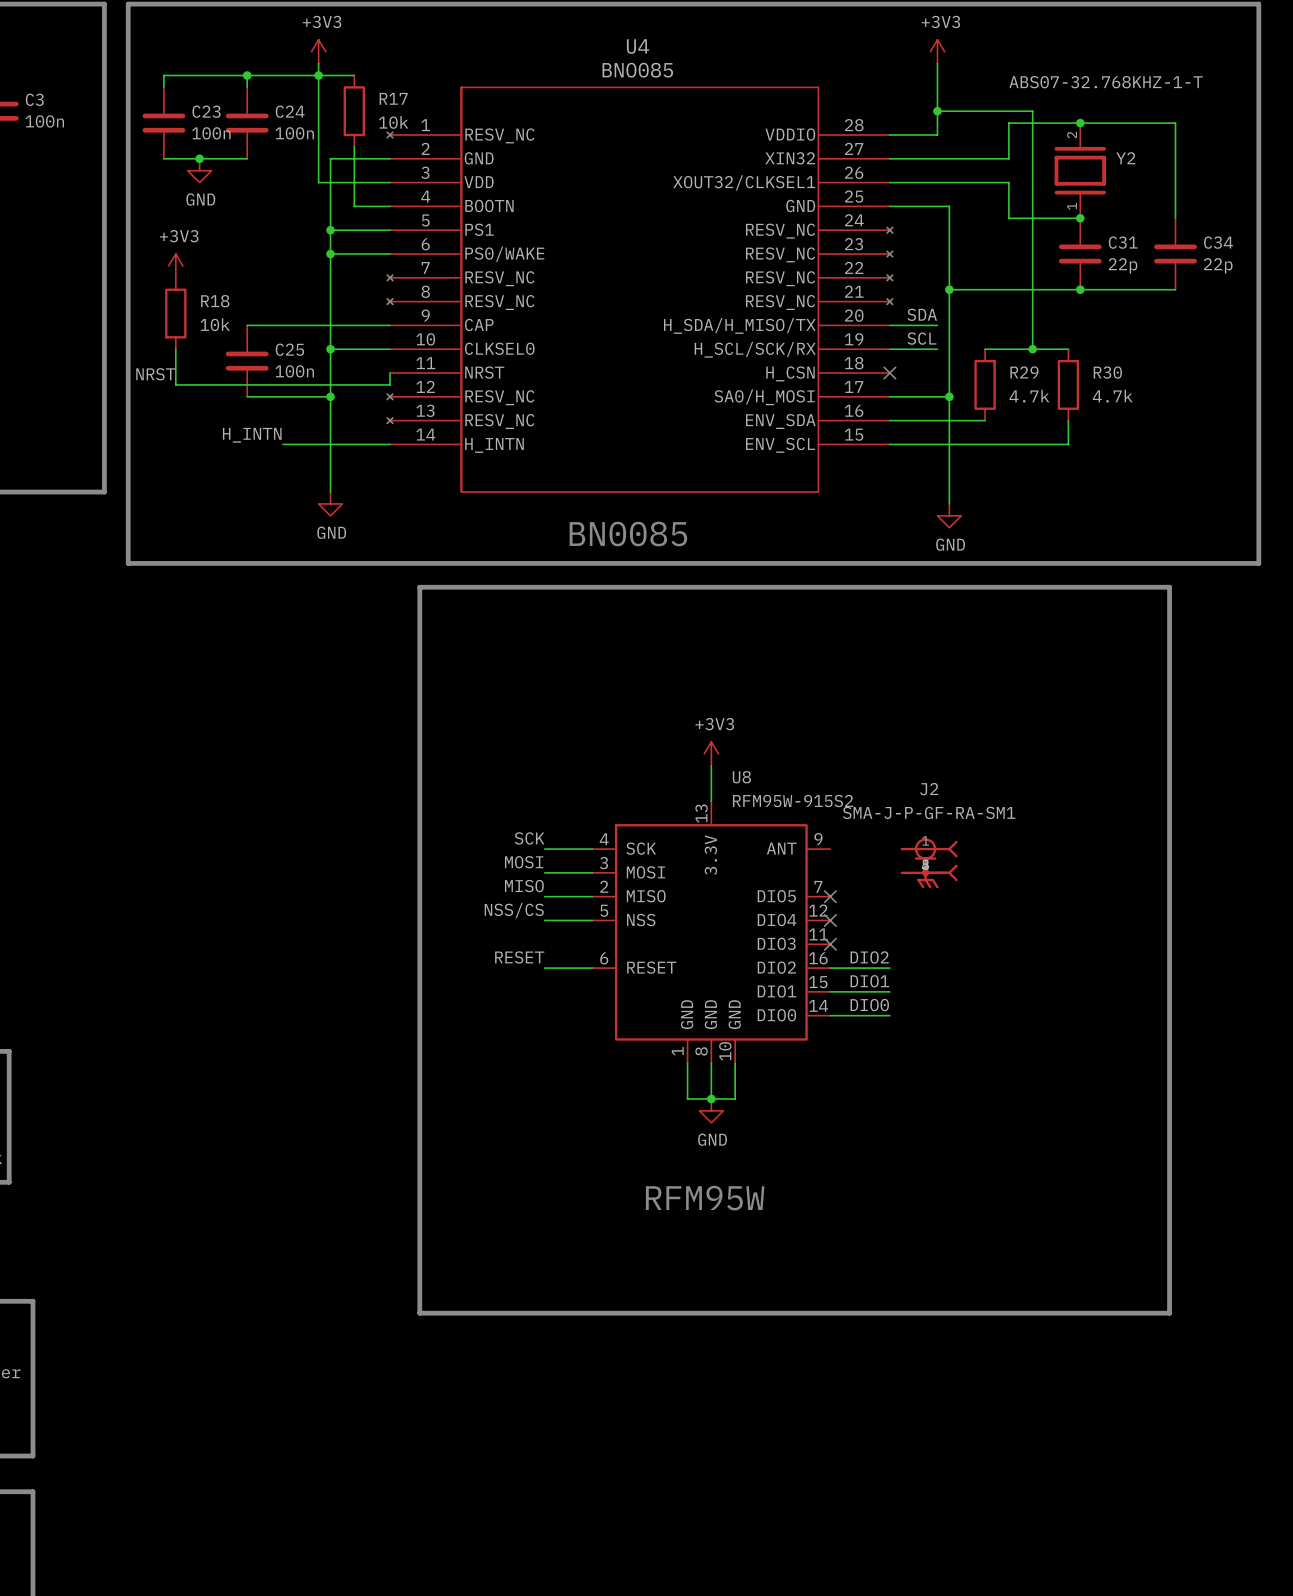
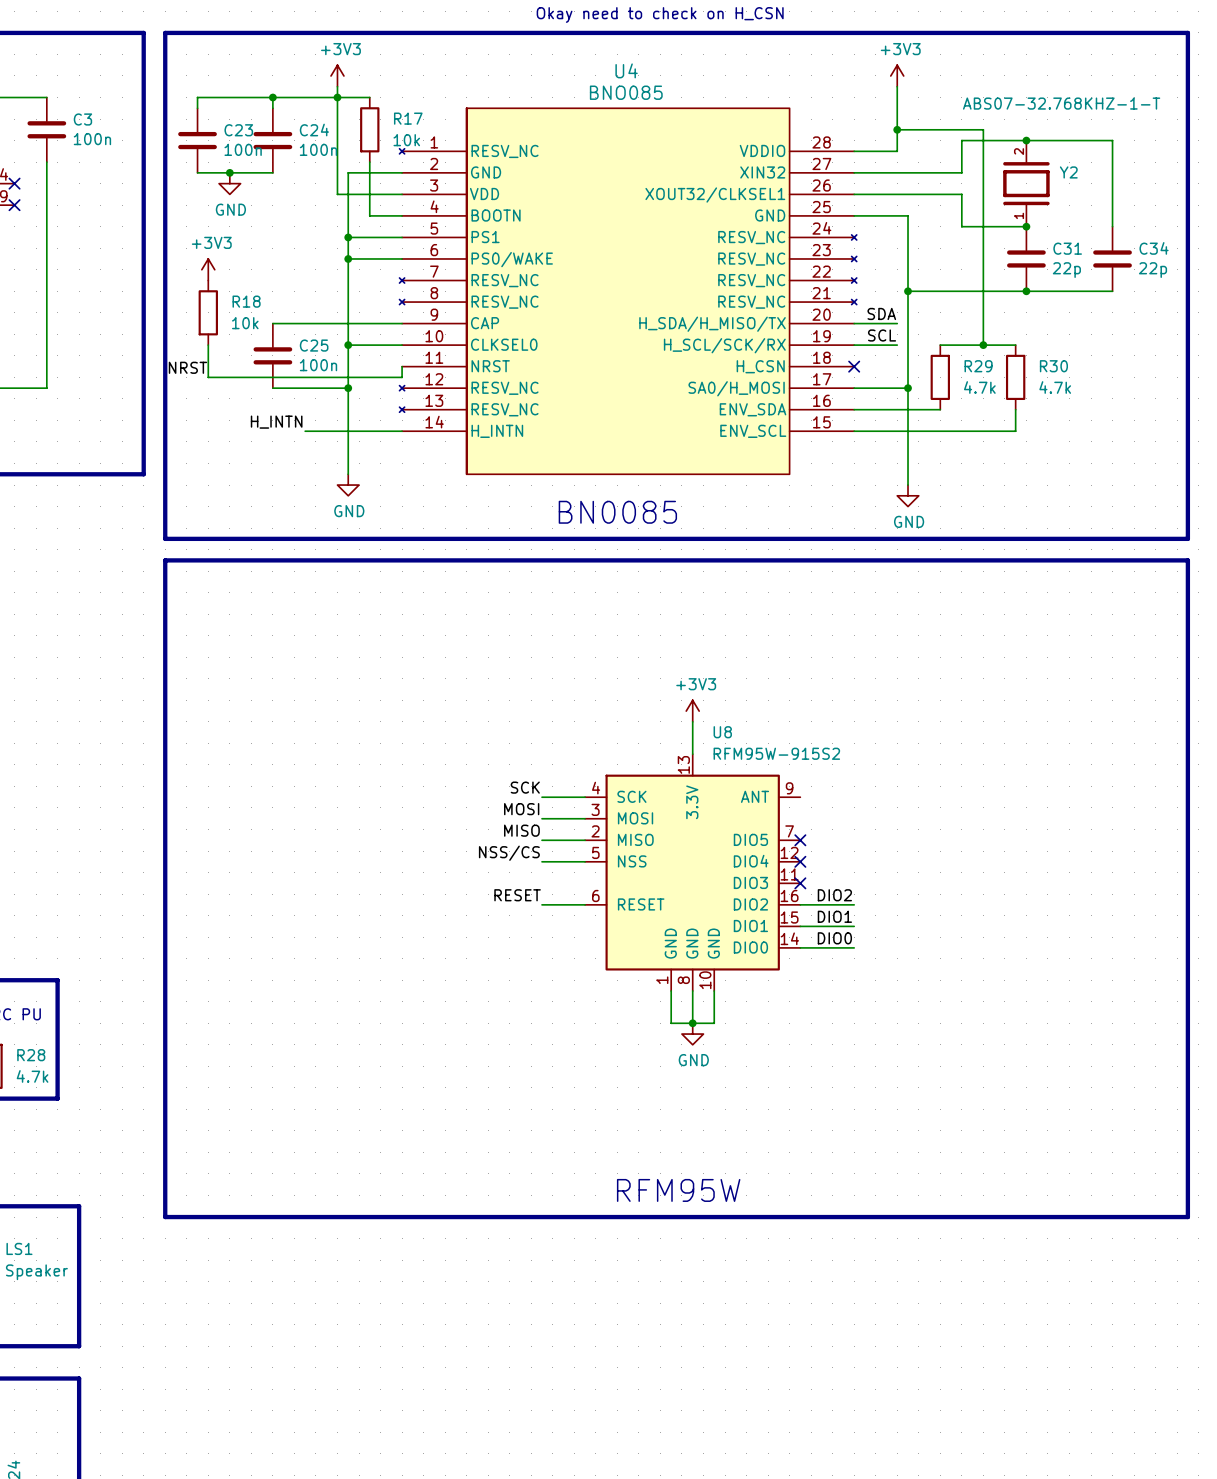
line: (419, 587) (419, 1313) -> (428, 560) (165, 560) (165, 1217) (428, 1217)
line: (1169, 587) (1169, 1313) -> (1107, 560) (1187, 560) (1187, 1217) (1107, 1217)
J2: SMA-J-P-GF-RA-SM1 (929, 863) -> none
text position: RFM95W (705, 1198) -> RFM95W (678, 1190)

